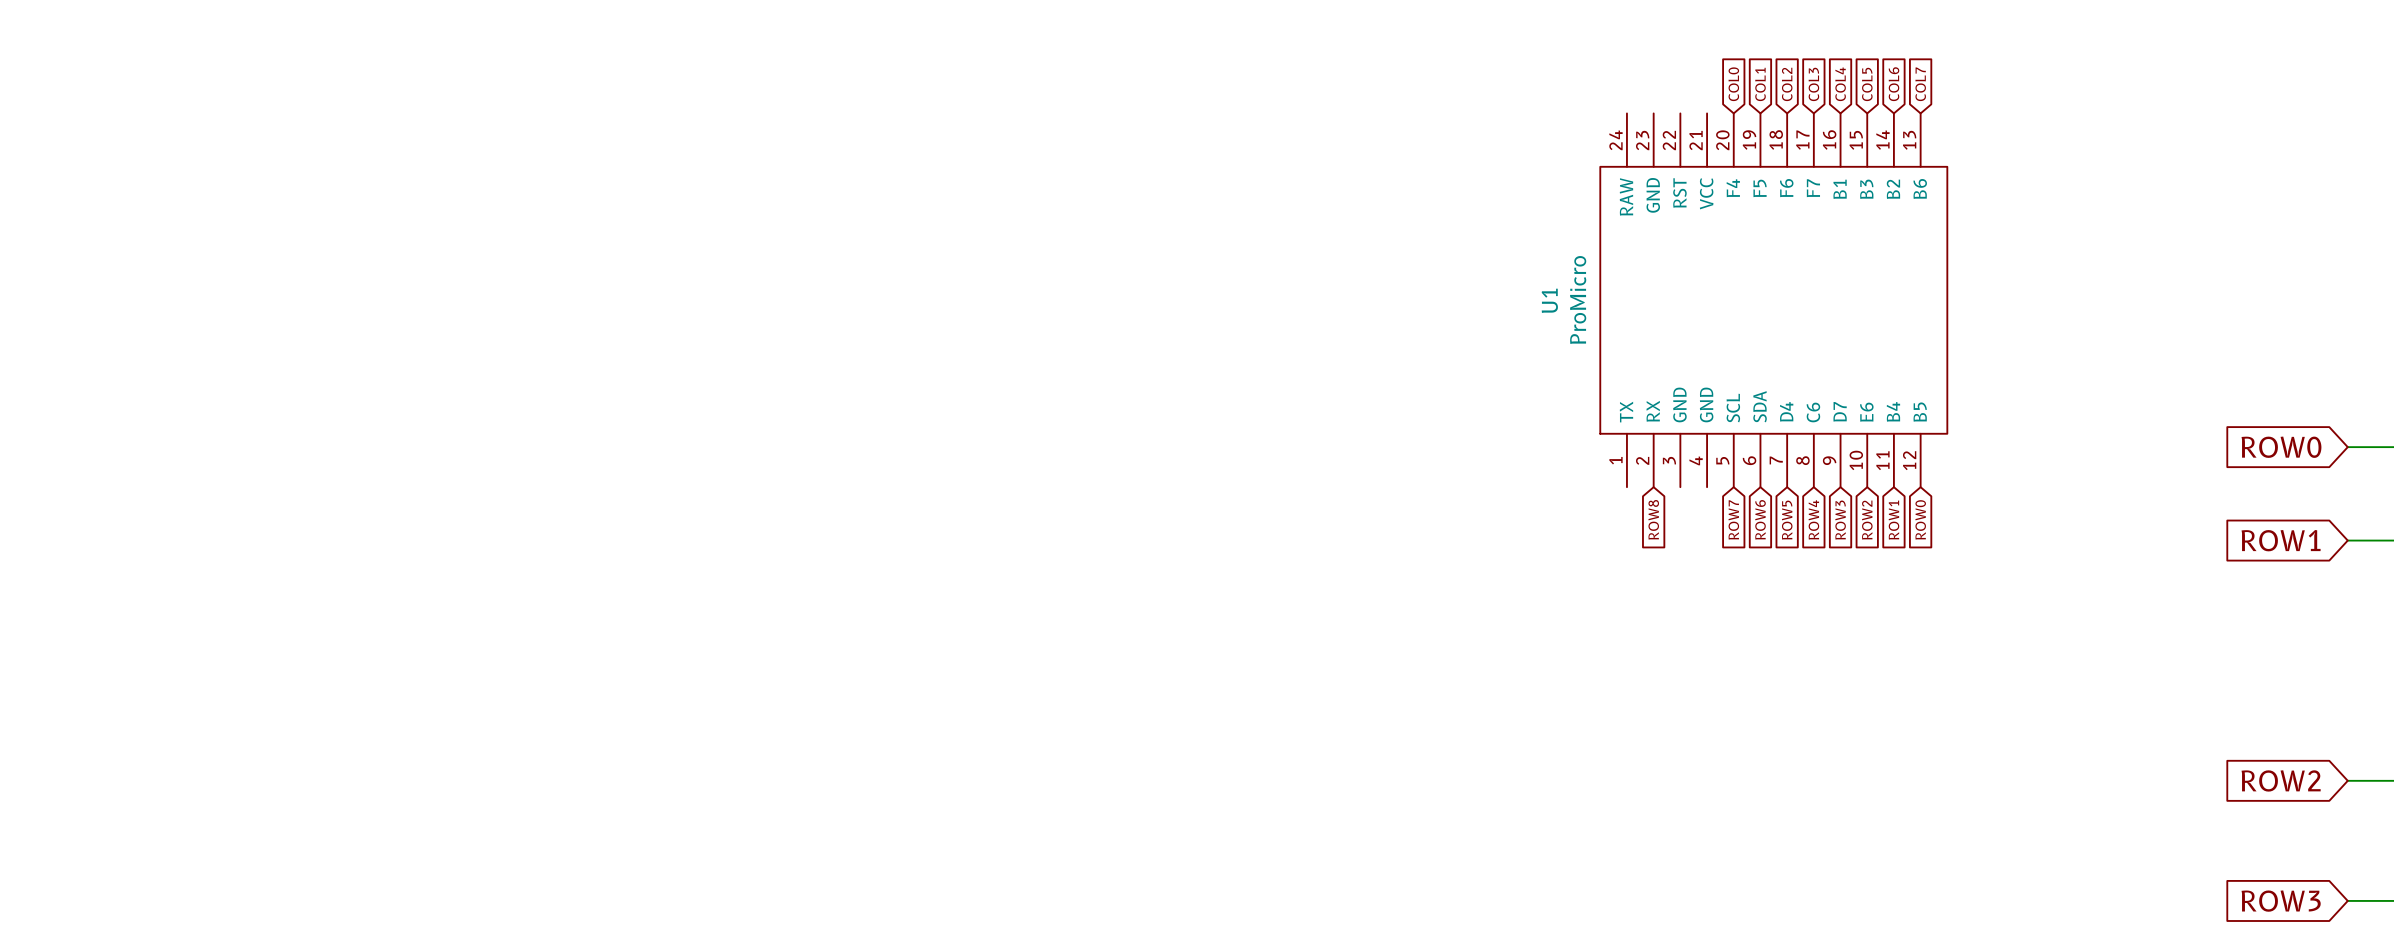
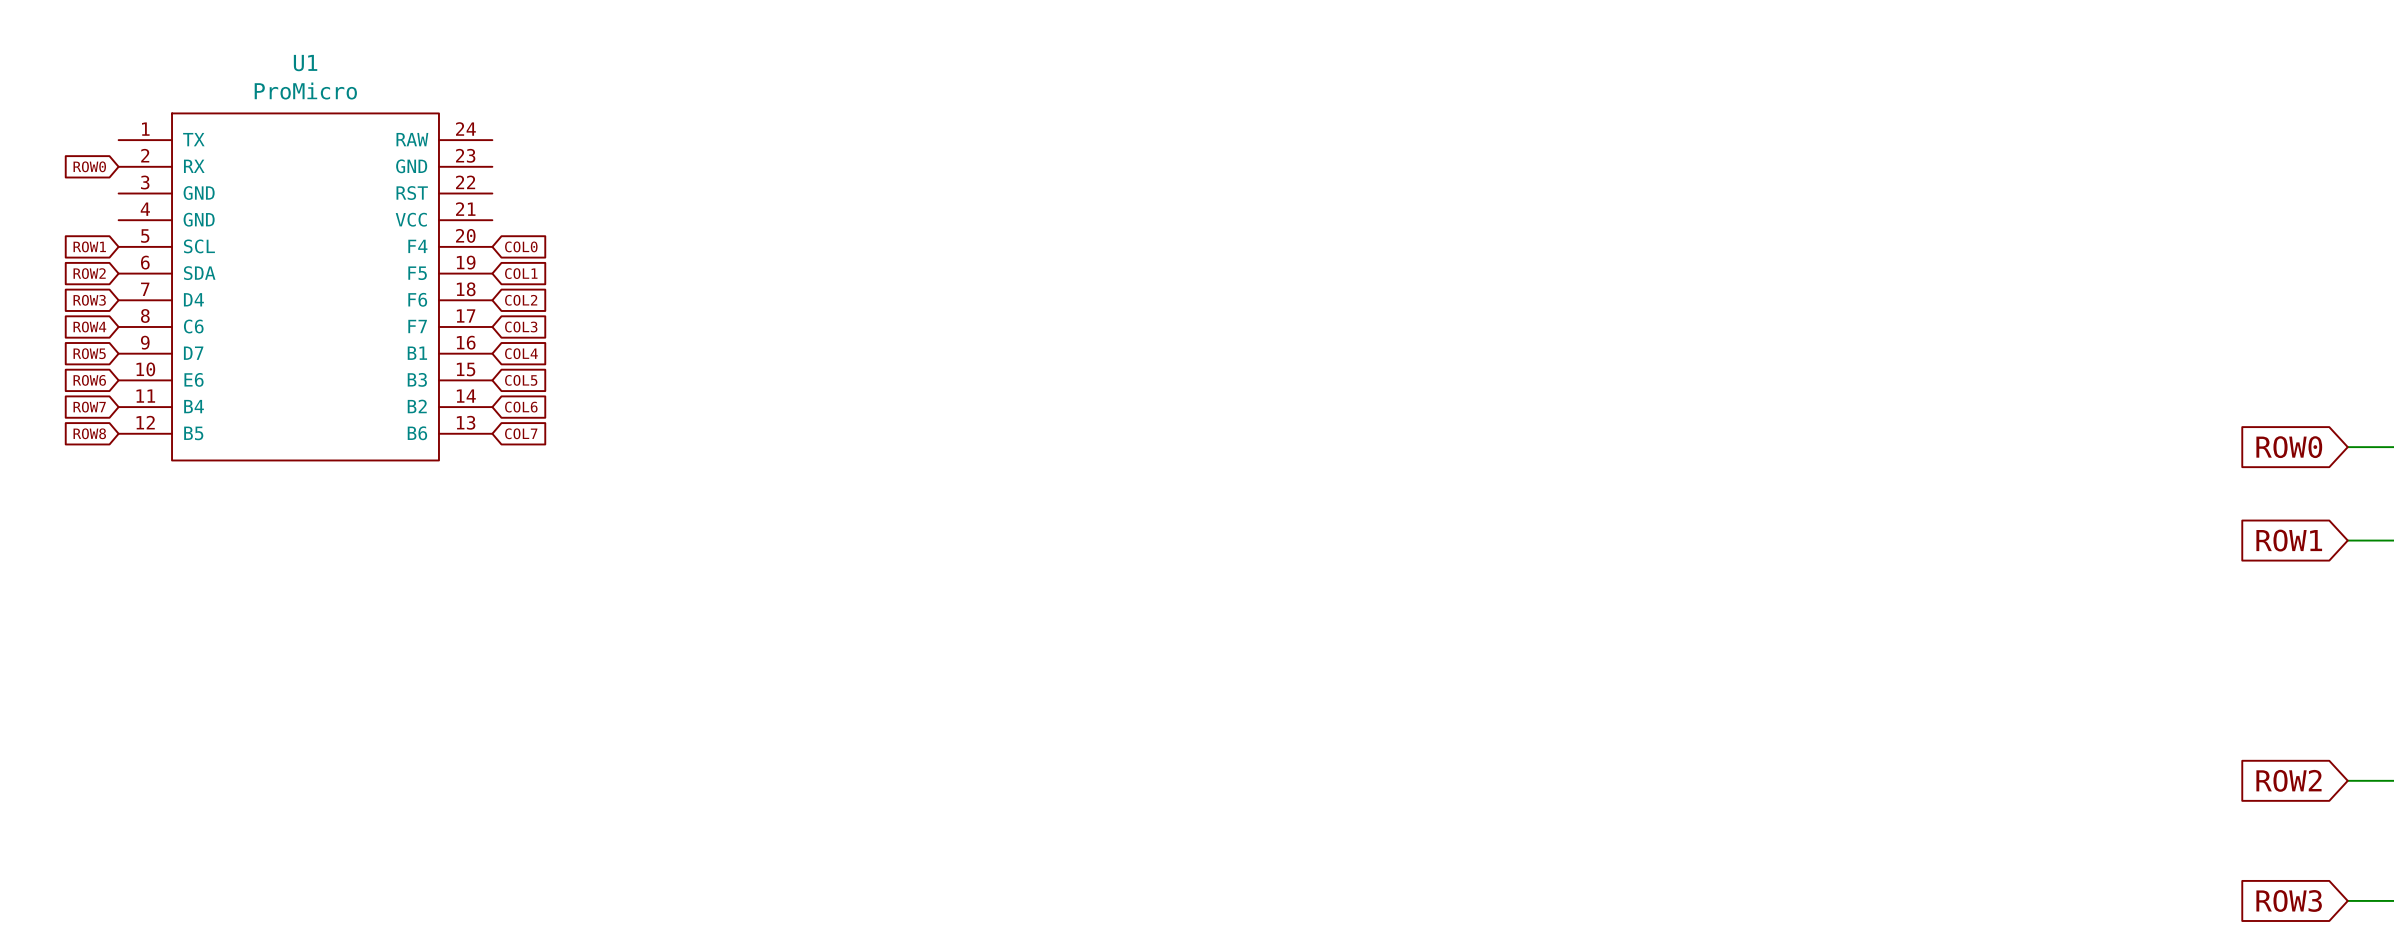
global label: COL0 (1733, 84) -> none
global label: COL1 (1760, 84) -> none
global label: COL2 (1787, 84) -> none
global label: COL3 (1813, 84) -> none
global label: COL4 (1840, 84) -> none
global label: COL5 (1867, 84) -> none
global label: COL6 (1893, 84) -> none
global label: COL7 (1920, 84) -> none
global label: none -> ROW0 (89, 166)
global label: none -> ROW1 (89, 246)
global label: none -> COL0 (521, 246)
global label: none -> ROW2 (89, 273)
global label: none -> COL1 (521, 273)
global label: none -> ROW3 (89, 300)
global label: none -> COL2 (521, 300)
U1 rotation: 0° (1773, 300) -> 90° clockwise (305, 286)
U1 position: (1773, 300) -> (305, 286)
global label: none -> ROW4 (89, 327)
global label: none -> COL3 (521, 327)
global label: none -> ROW5 (89, 353)
global label: none -> COL4 (521, 353)
global label: none -> ROW6 (89, 380)
global label: none -> COL5 (521, 380)
global label: none -> ROW7 (89, 407)
global label: none -> COL6 (521, 407)
global label: none -> ROW8 (89, 433)
global label: none -> COL7 (521, 433)
global label: ROW8 (1653, 519) -> none
global label: ROW7 (1733, 519) -> none
global label: ROW6 (1760, 519) -> none
global label: ROW4 (1813, 519) -> none
global label: ROW0 (1920, 519) -> none
global label: ROW5 (1787, 520) -> none
global label: ROW3 (1840, 520) -> none
global label: ROW2 (1867, 520) -> none
global label: ROW1 (1893, 520) -> none

